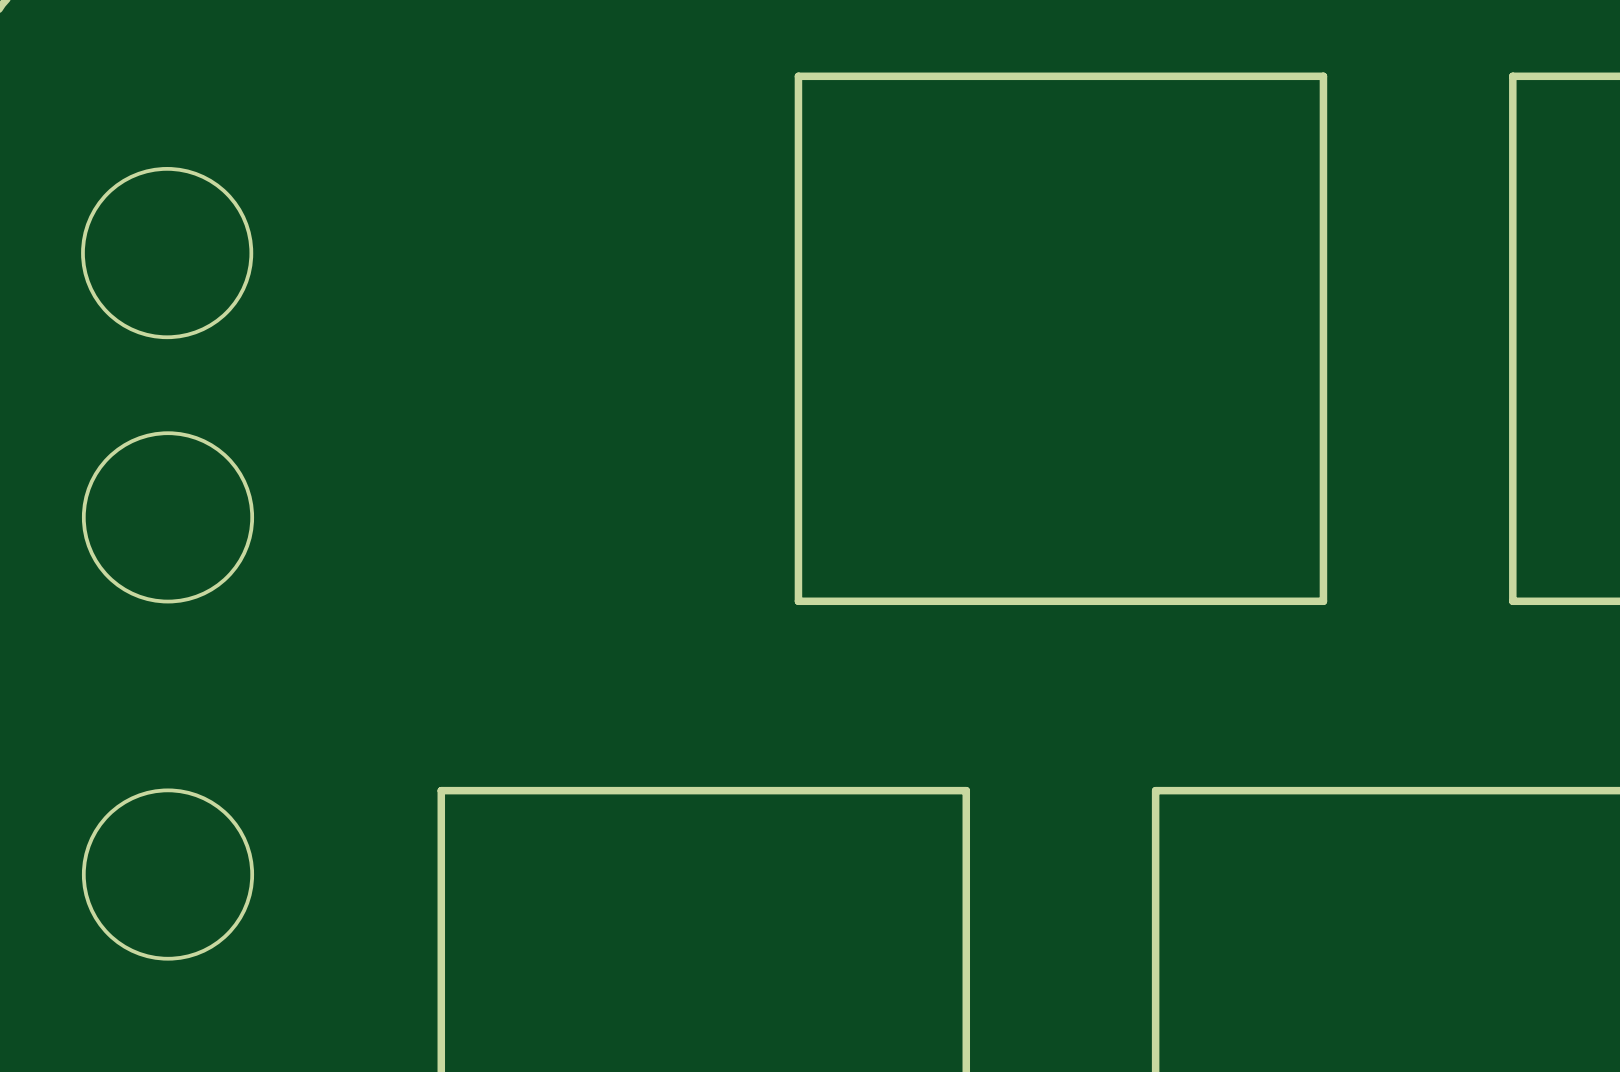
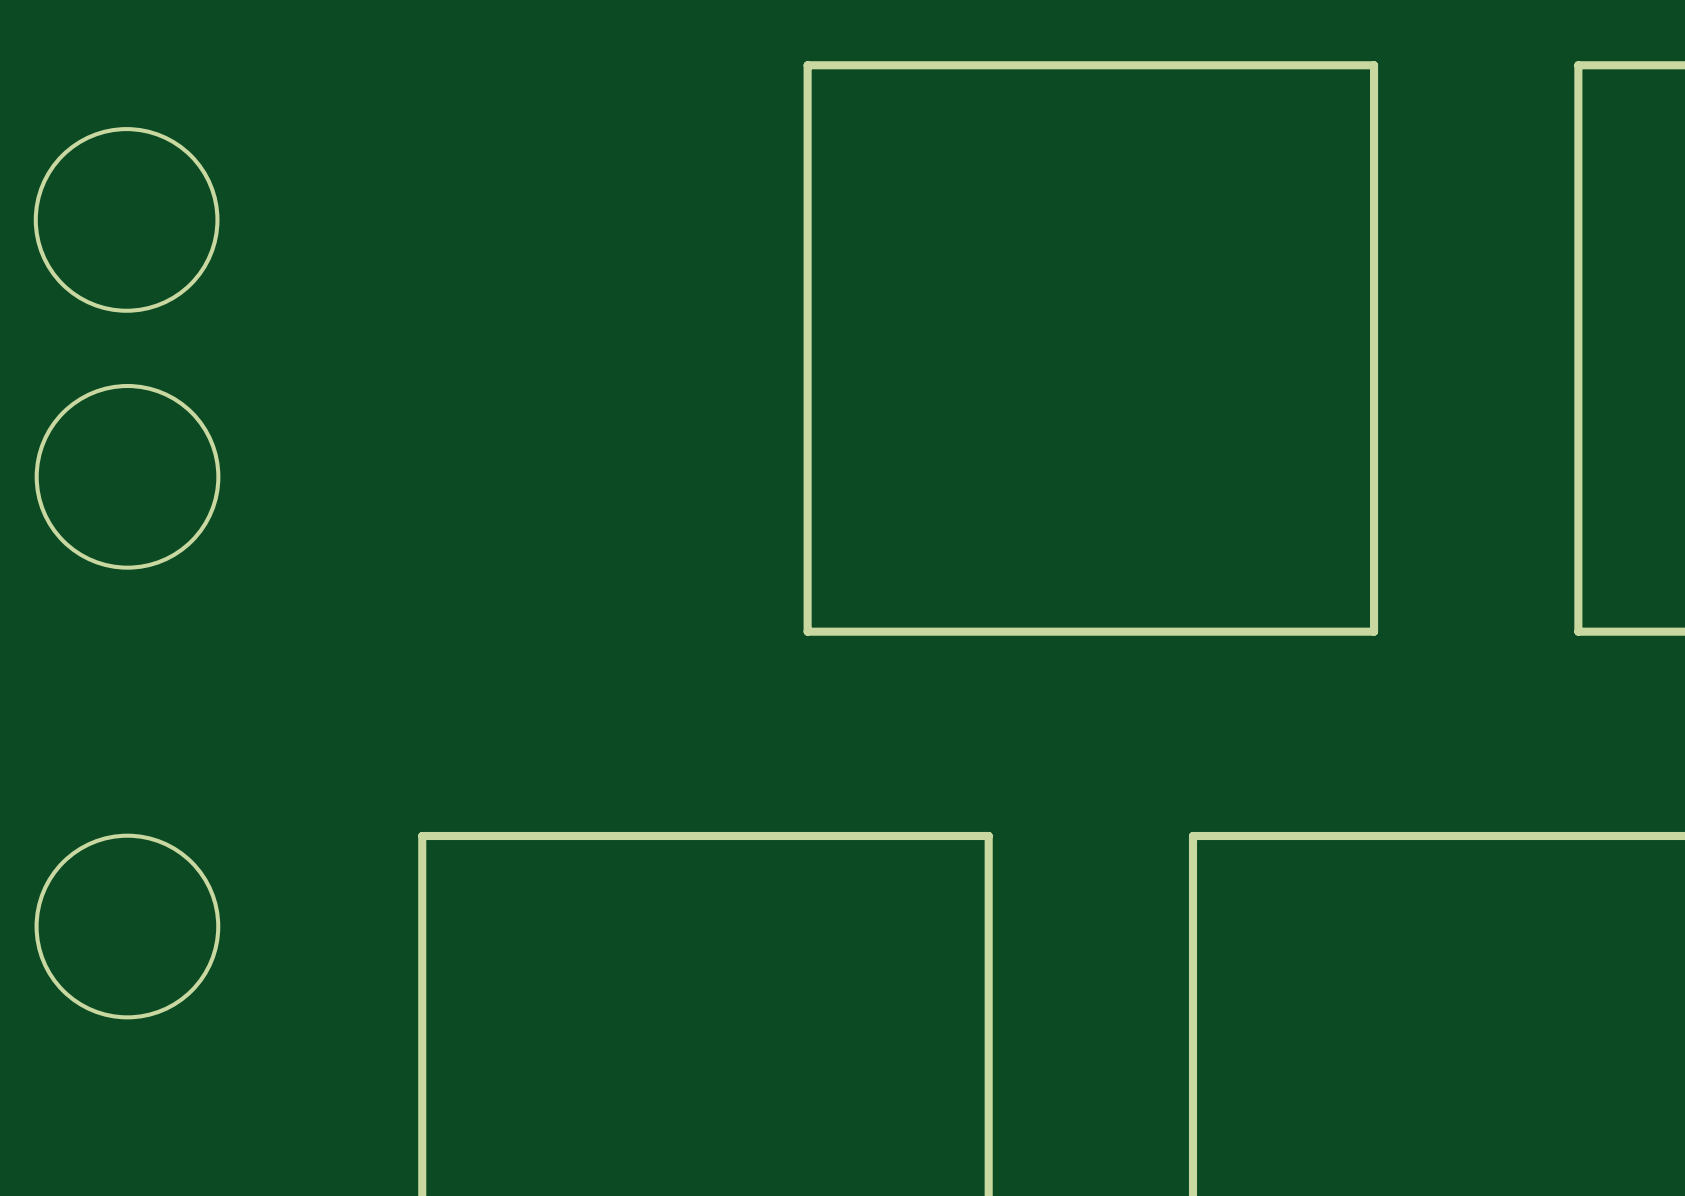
round board edge position: (167, 253) -> (126, 219)
round board edge position: (167, 517) -> (127, 476)

